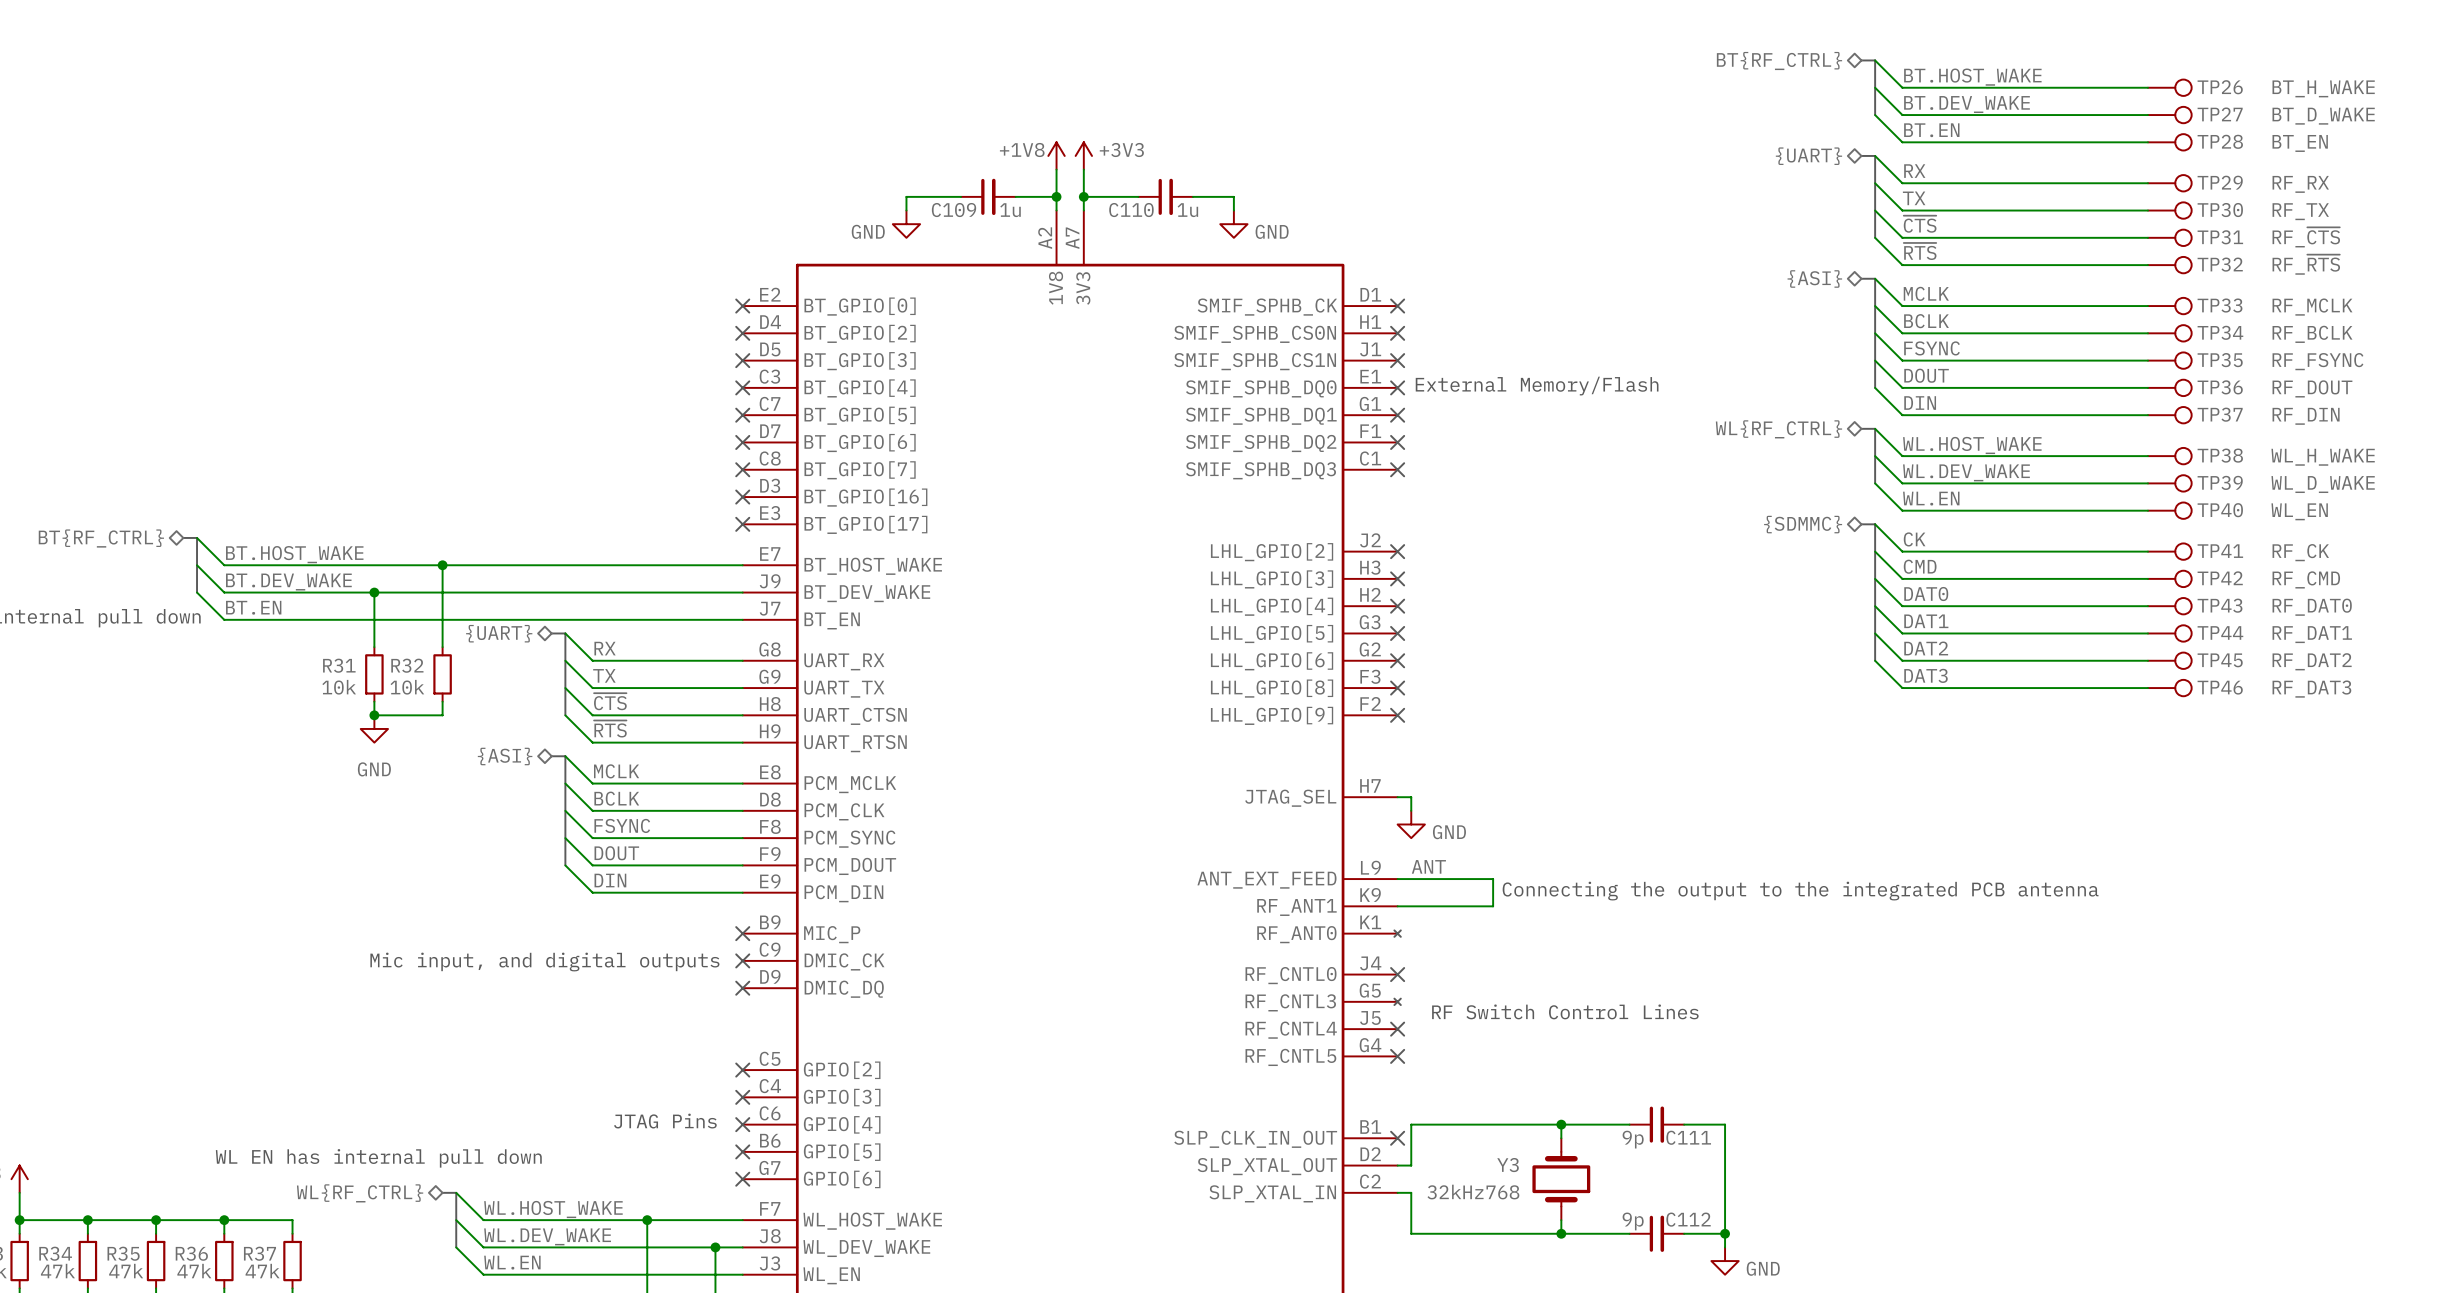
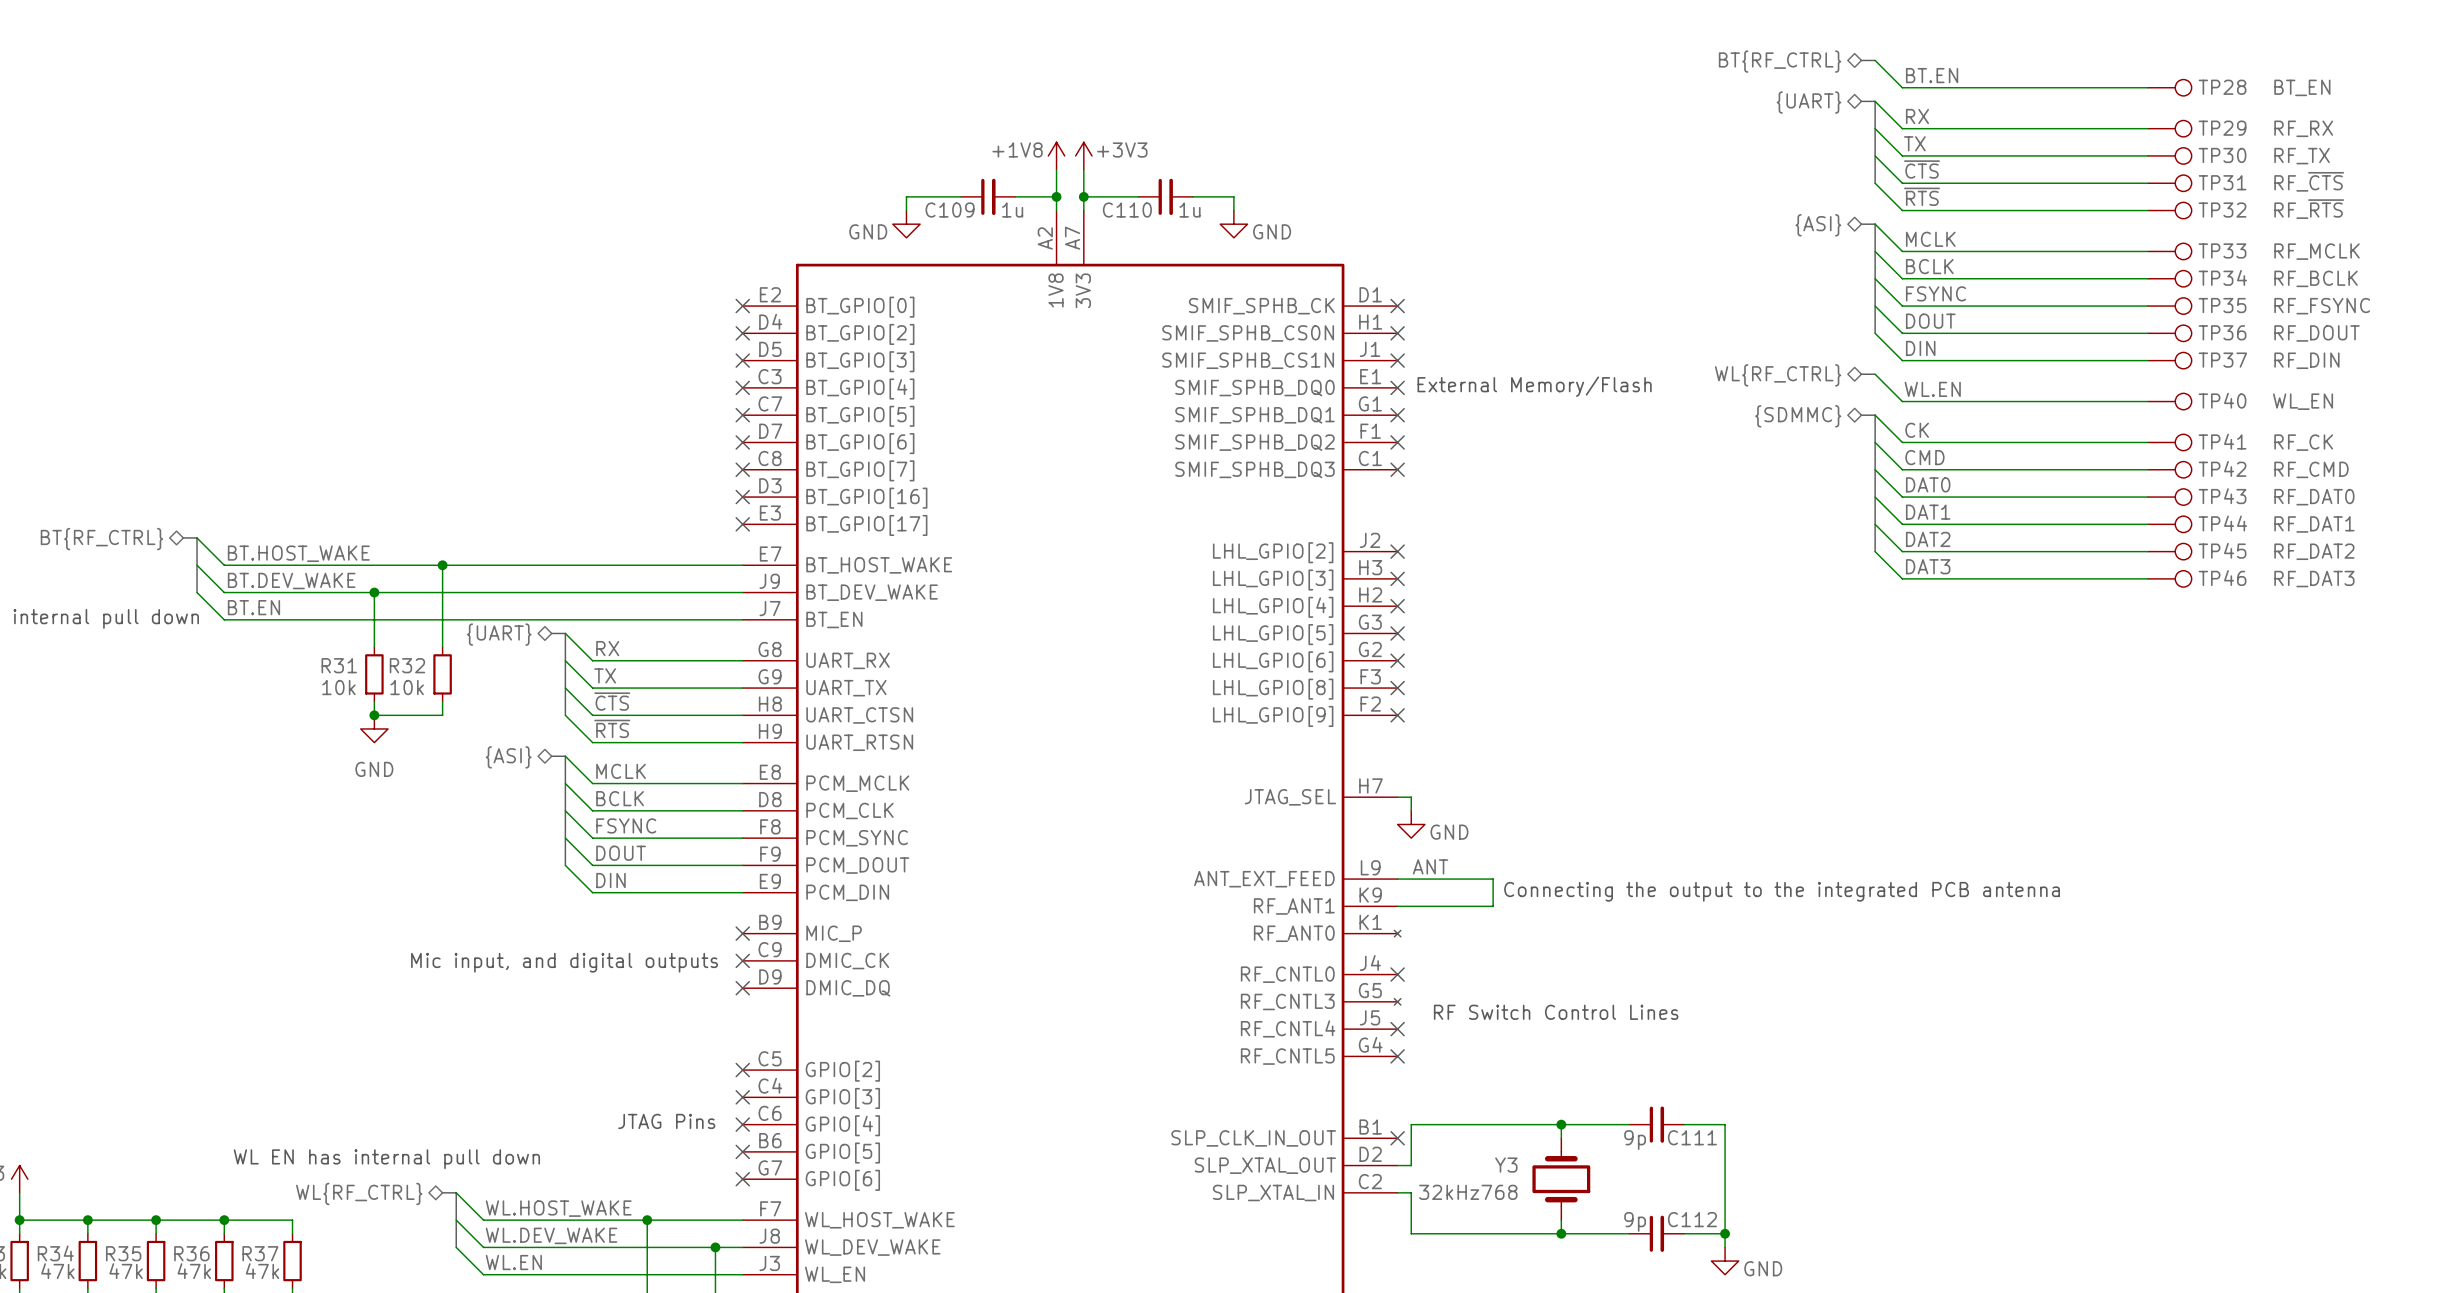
bus: (1875, 60) (1875, 101) -> (1861, 101) (1875, 101)
label: BT.HOST_WAKE (1972, 77) -> BT.EN (1932, 75)
wire: (1875, 87) (1902, 115) (2147, 115) -> (1875, 101) (1902, 128) (2147, 128)
TP26 name: TP26 (2220, 87) -> TP28 (2222, 87)
TP26 value: BT_H_WAKE (2323, 88) -> BT_EN (2302, 87)
label: BT.DEV_WAKE (1966, 104) -> none
wire: (1875, 115) (1902, 142) (2147, 142) -> (1875, 128) (1902, 155) (2147, 155)
TP27: BT_D_WAKE (2169, 115) -> none
label: none -> RX (1917, 116)
TP29: none -> RF_RX (2169, 128)
label: BT.EN (1931, 130) -> none
TP28: BT_EN (2169, 142) -> none
label: none -> TX (1914, 143)
bus: (1861, 155) (1875, 155) -> (1875, 115) (1875, 155)
TP30: none -> RF_TX (2169, 155)
hierarchical label position: {UART} (1808, 156) -> {UART} (1808, 102)
label: RX (1914, 171) -> ~{CTS} (1922, 169)
TP29 name: TP29 (2220, 182) -> TP31 (2222, 182)
bus: (1875, 183) (1875, 224) -> (1861, 224) (1875, 224)
TP29 value: RF_RX (2300, 184) -> RF_~{CTS} (2309, 181)
label: TX (1914, 198) -> ~{RTS} (1922, 196)
wire: (1875, 210) (1902, 237) (2147, 237) -> (1875, 224) (1902, 251) (2147, 251)
TP30 name: TP30 (2220, 210) -> TP32 (2222, 210)
TP30 value: RF_TX (2300, 211) -> RF_~{RTS} (2309, 209)
label: ~{CTS} (1920, 224) -> none
wire: (1875, 237) (1902, 265) (2147, 265) -> (1875, 251) (1902, 278) (2147, 278)
TP31: RF_~{CTS} (2169, 237) -> none
label: none -> MCLK (1930, 239)
label: ~{RTS} (1920, 251) -> none
TP33: none -> RF_MCLK (2169, 251)
TP32: RF_~{RTS} (2169, 265) -> none
label: none -> BCLK (1929, 266)
hierarchical label position: {ASI} (1814, 278) -> {ASI} (1818, 225)
bus: (1861, 278) (1875, 278) -> (1875, 237) (1875, 278)
TP34: none -> RF_BCLK (2169, 278)
label: MCLK (1926, 293) -> FSYNC (1935, 293)
TP33 name: TP33 (2220, 305) -> TP35 (2222, 305)
TP33 value: RF_MCLK (2312, 307) -> RF_FSYNC (2322, 306)
label: BCLK (1926, 321) -> DOUT (1930, 321)
TP34 name: TP34 (2220, 332) -> TP36 (2222, 332)
bus: (1875, 333) (1875, 387) -> none
TP34 value: RF_BCLK (2312, 334) -> RF_DOUT (2317, 333)
label: FSYNC (1932, 348) -> DIN (1920, 348)
wire: (1875, 360) (1902, 387) (2147, 387) -> (1875, 374) (1902, 401) (2147, 401)
TP35 name: TP35 (2220, 360) -> TP37 (2222, 360)
TP35 value: RF_FSYNC (2317, 361) -> RF_DIN (2306, 360)
bus: none -> (1861, 374) (1875, 374)
label: DOUT (1926, 375) -> none
wire: (1875, 387) (1902, 415) (2147, 415) -> none
TP36: RF_DOUT (2169, 387) -> none
label: DIN (1920, 403) -> none
TP37: RF_DIN (2169, 415) -> none
bus: (1861, 428) (1875, 428) -> (1861, 415) (1875, 415) (1875, 428)
wire: (1875, 428) (1902, 456) (2147, 456) -> (1875, 442) (1902, 469) (2147, 469)
hierarchical label position: WL{RF_CTRL} (1778, 429) -> WL{RF_CTRL} (1778, 375)
label: none -> CK (1917, 430)
TP41: none -> RF_CK (2169, 442)
label: WL.HOST_WAKE (1972, 445) -> none
wire: (1875, 456) (1902, 483) (2147, 483) -> (1875, 469) (1902, 497) (2147, 497)
TP38: WL_H_WAKE (2169, 456) -> none
label: none -> CMD (1924, 457)
TP42: none -> RF_CMD (2169, 469)
label: WL.DEV_WAKE (1966, 472) -> none
wire: (1875, 483) (1902, 510) (2147, 510) -> (1875, 497) (1902, 524) (2147, 524)
TP39: WL_D_WAKE (2169, 483) -> none
label position: WL.EN (1931, 498) -> WL.EN (1932, 389)
TP40 position: (2169, 510) -> (2169, 401)
hierarchical label position: {SDMMC} (1803, 524) -> {SDMMC} (1798, 416)
bus: (1861, 524) (1875, 524) -> (1875, 483) (1875, 524)
label: CK (1914, 539) -> DAT2 (1928, 539)
bus: (1875, 551) (1875, 660) -> none
TP41 name: TP41 (2220, 551) -> TP45 (2222, 550)
TP41 value: RF_CK (2300, 552) -> RF_DAT2 (2314, 551)
label: CMD (1920, 566) -> DAT3 (1928, 566)
wire: (1875, 578) (1902, 606) (2147, 606) -> (1875, 415) (1902, 442) (2147, 442)
TP42 name: TP42 (2220, 578) -> TP46 (2222, 578)
TP42 value: RF_CMD (2306, 579) -> RF_DAT3 (2314, 579)
label position: DAT0 (1926, 594) -> DAT0 (1928, 484)
wire: (1875, 606) (1902, 633) (2147, 633) -> none
TP43 position: (2169, 606) -> (2169, 497)
label position: DAT1 (1926, 621) -> DAT1 (1928, 512)
wire: (1875, 633) (1902, 660) (2147, 660) -> none
TP44 position: (2169, 633) -> (2169, 524)
label: DAT2 (1926, 648) -> none
wire: (1875, 660) (1902, 688) (2147, 688) -> none
TP45: RF_DAT2 (2169, 660) -> none
label: DAT3 (1925, 675) -> none
TP46: RF_DAT3 (2169, 688) -> none

